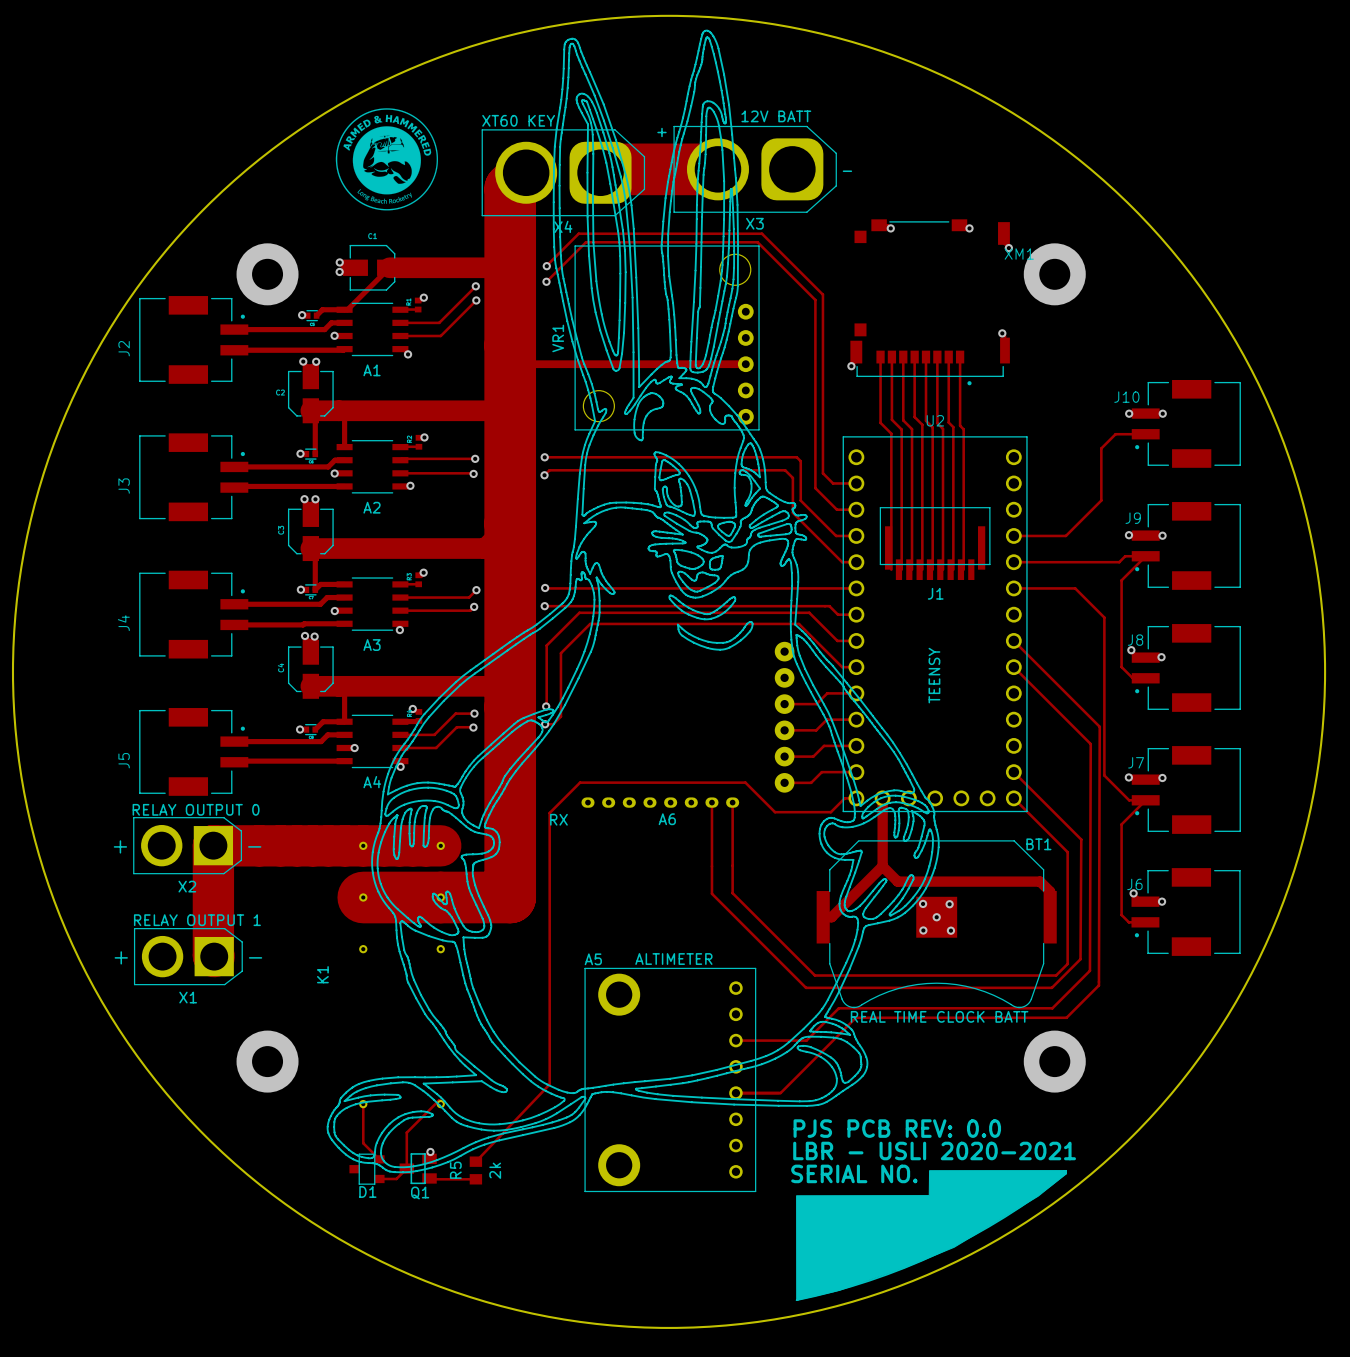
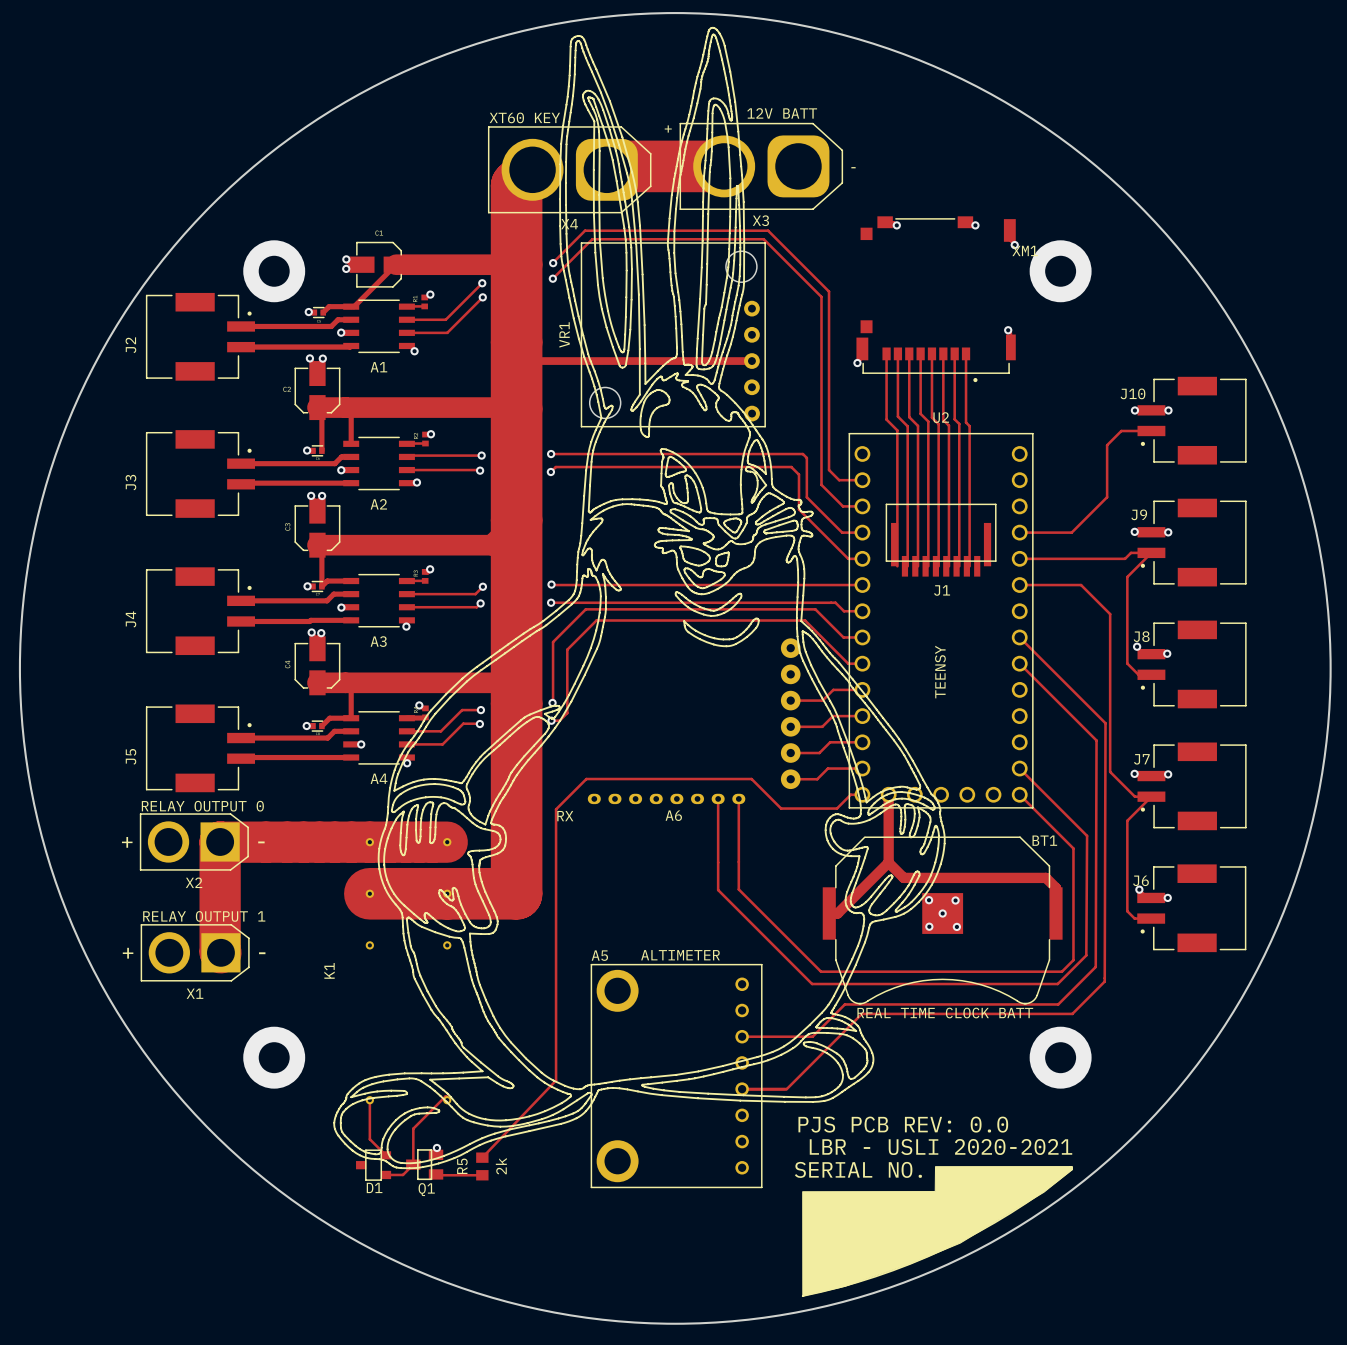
drawing: [335, 108, 439, 211] -> none
A5 footprint: [584, 967, 757, 1193] -> [590, 964, 763, 1189]

